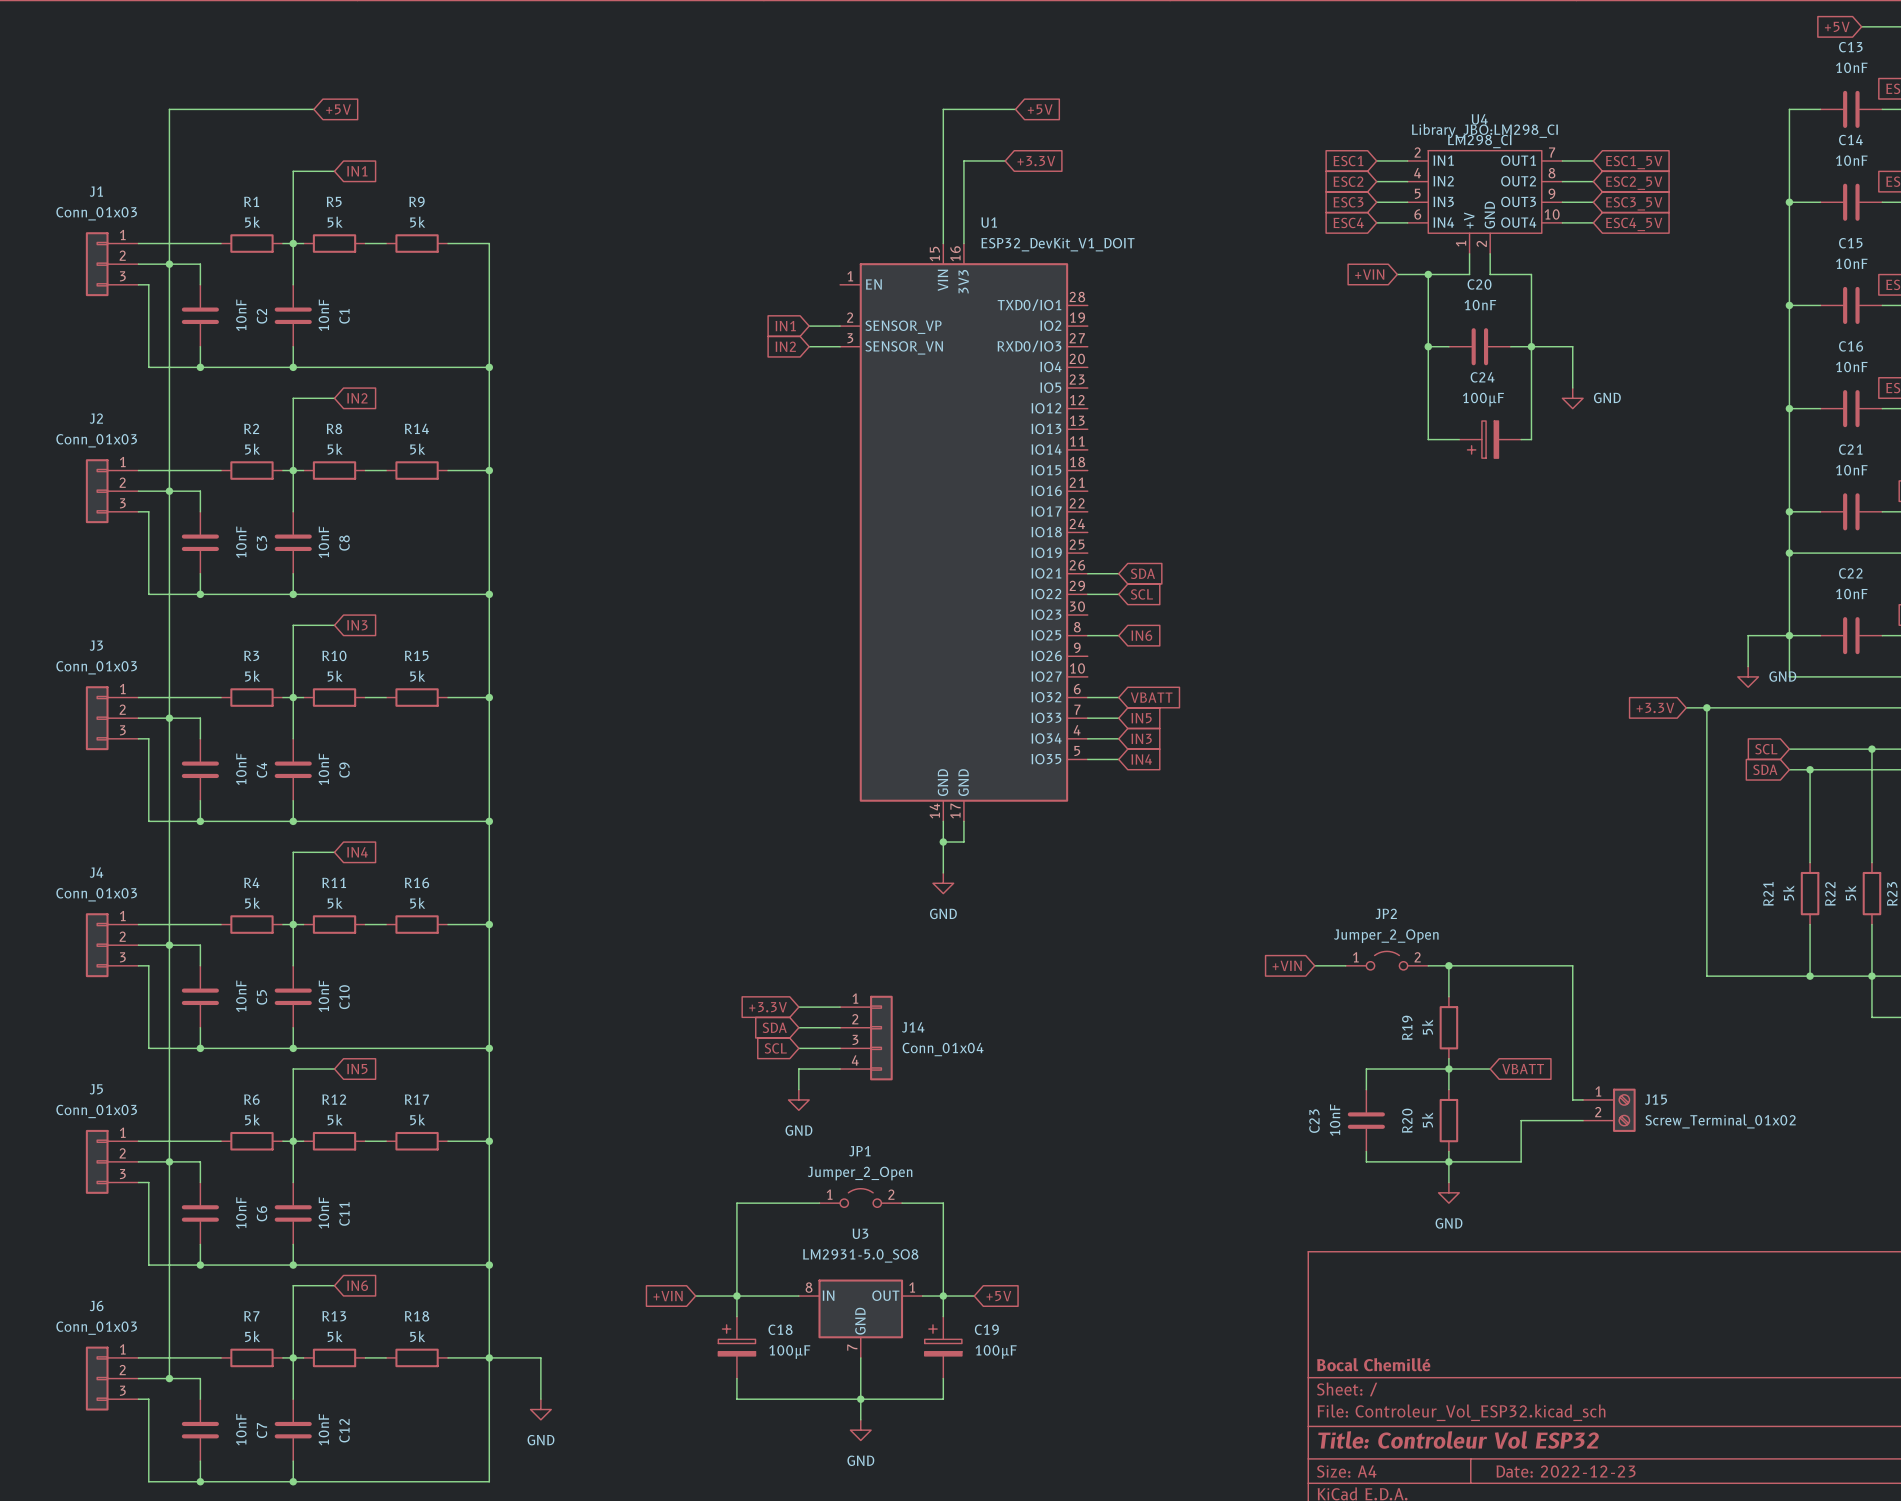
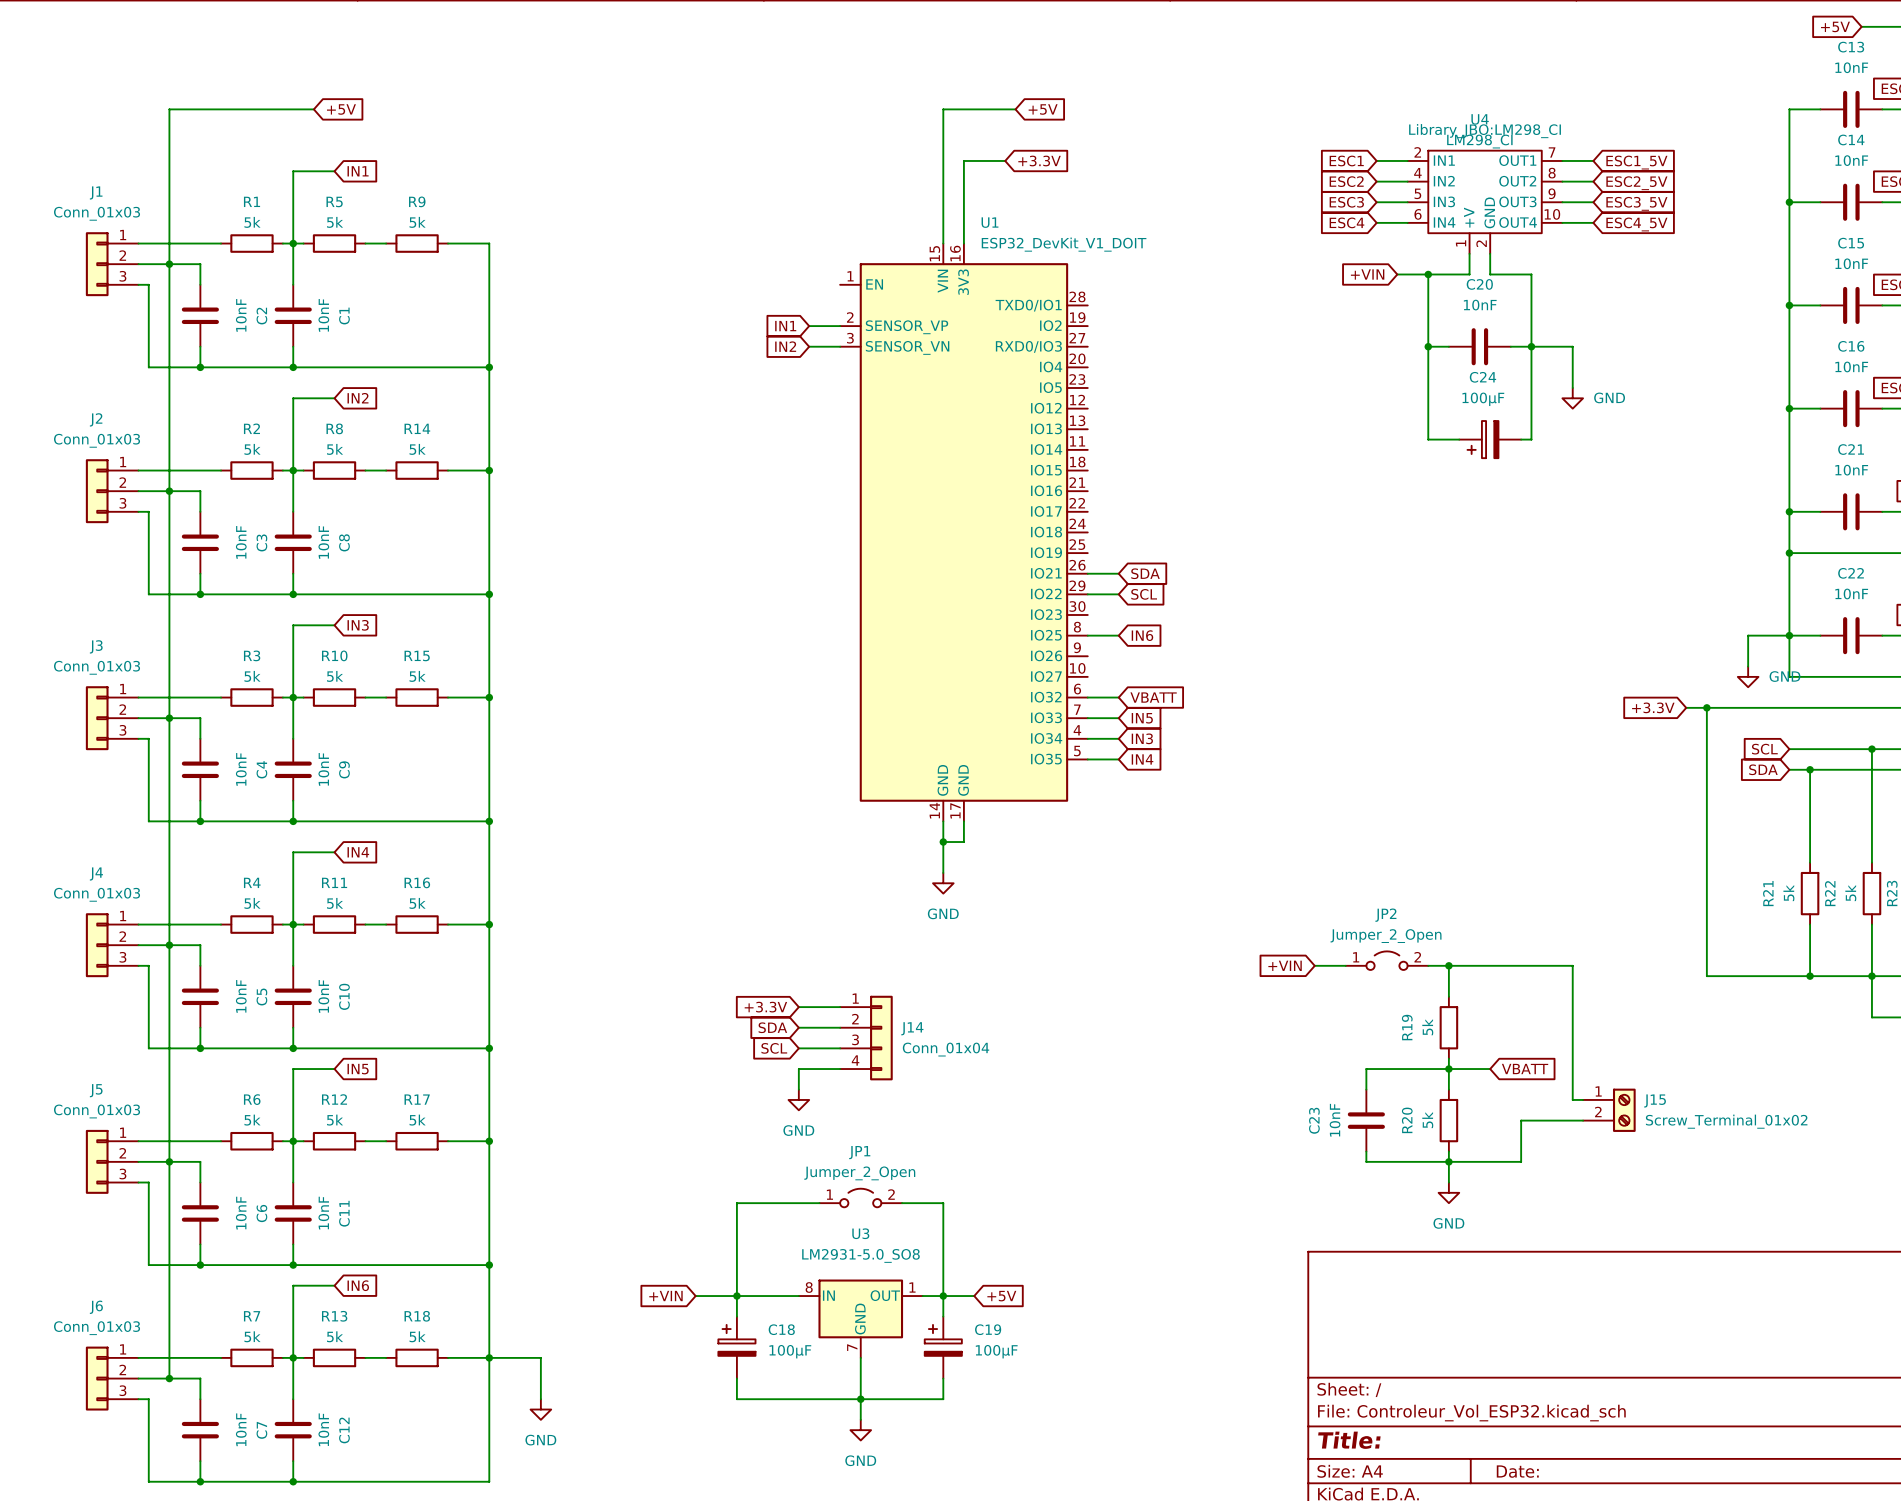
title block: Bocal Chemillé (1373, 1364) -> none
title block: Title: Controleur Vol ESP32 (1458, 1440) -> Title: (1349, 1440)
title block: Date: 2022-12-23 (1566, 1471) -> Date: (1517, 1471)

